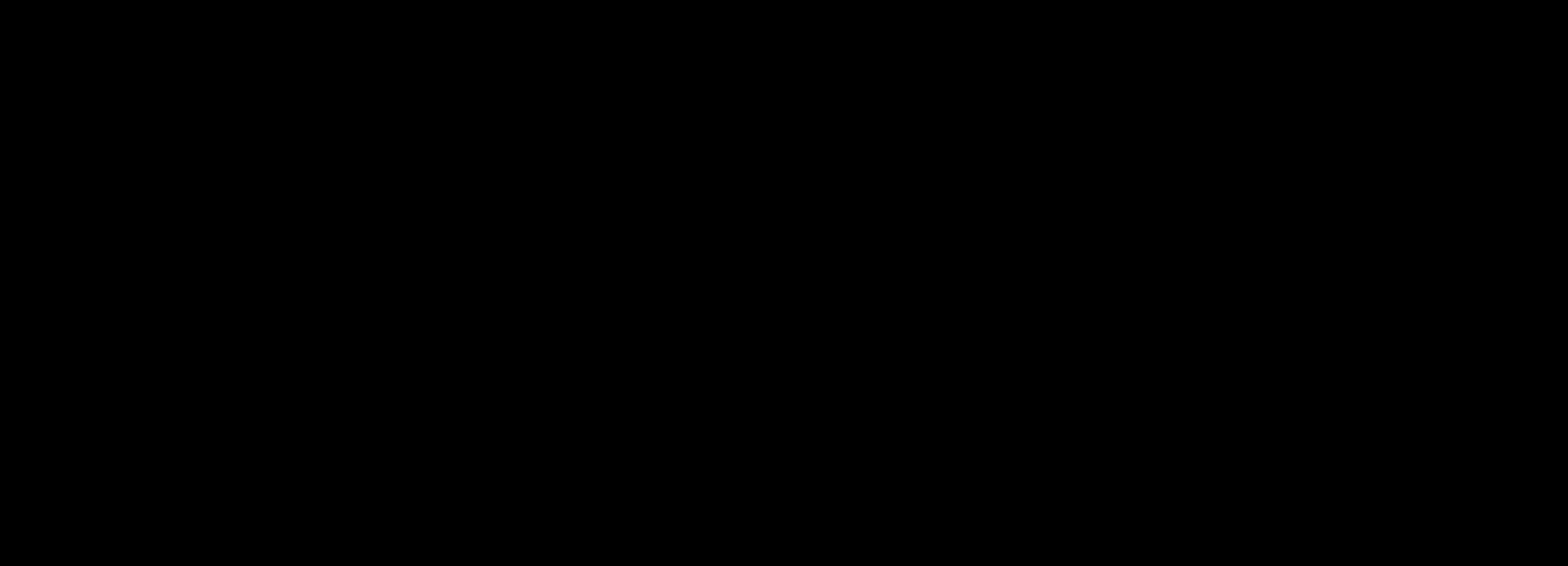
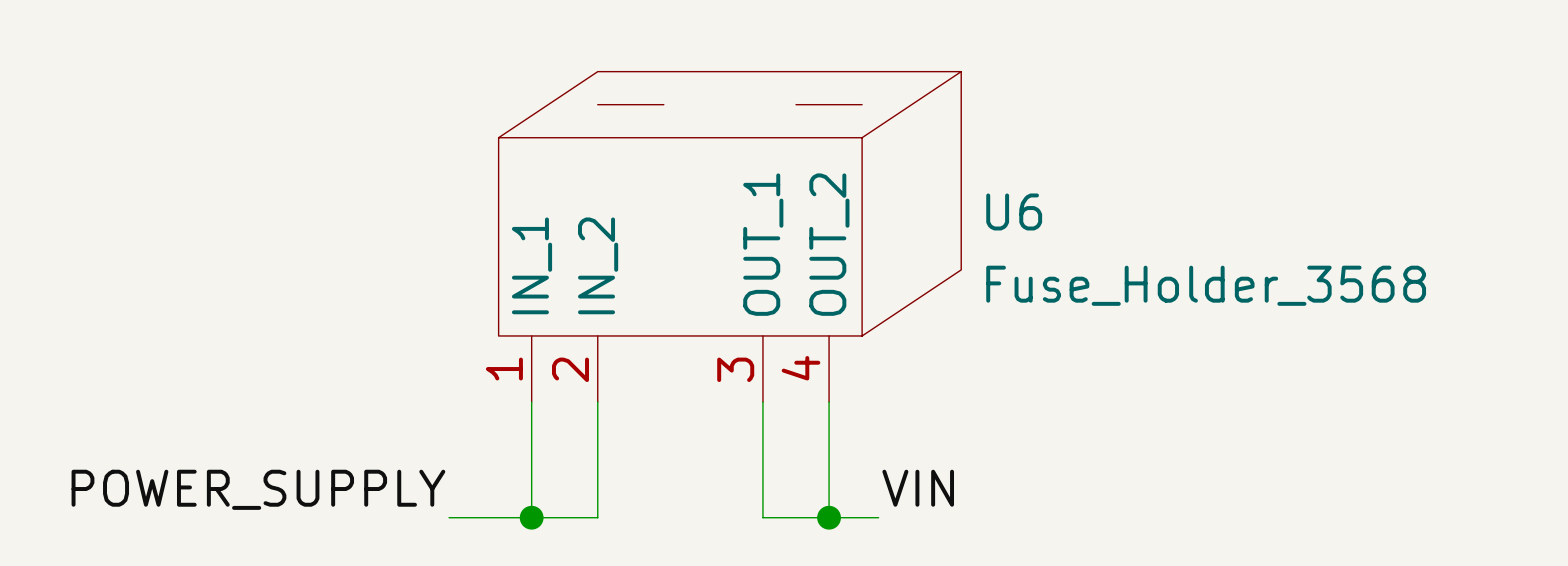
U6: none -> Fuse_Holder_3568 (729, 236)
wire: none -> (531, 402) (531, 517)
wire: none -> (597, 402) (597, 517) (449, 517)
wire: none -> (762, 402) (762, 517) (878, 517)
wire: none -> (829, 402) (829, 517)
label: none -> VIN (918, 488)
label: none -> POWER_SUPPLY (258, 489)
junction: none -> (531, 517)
junction: none -> (829, 517)

